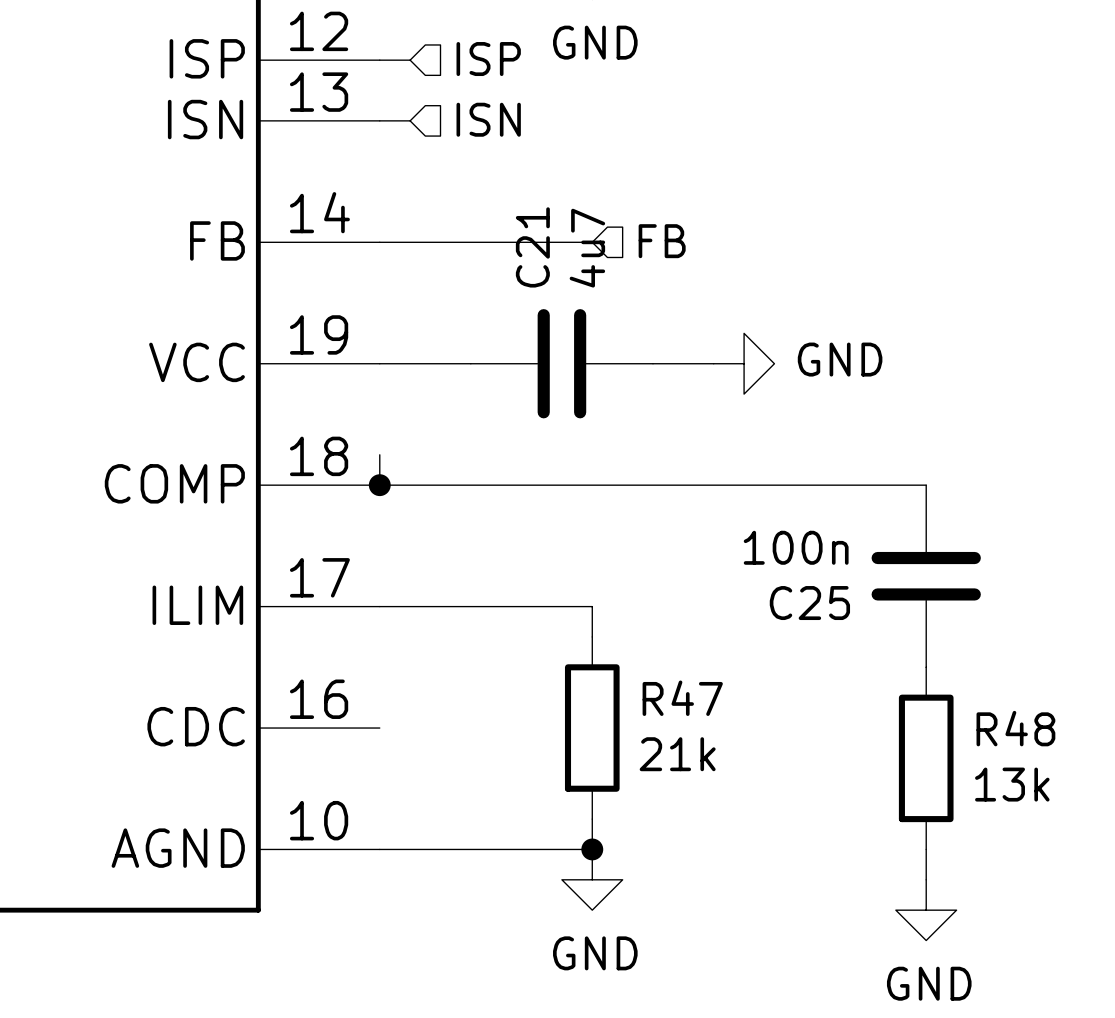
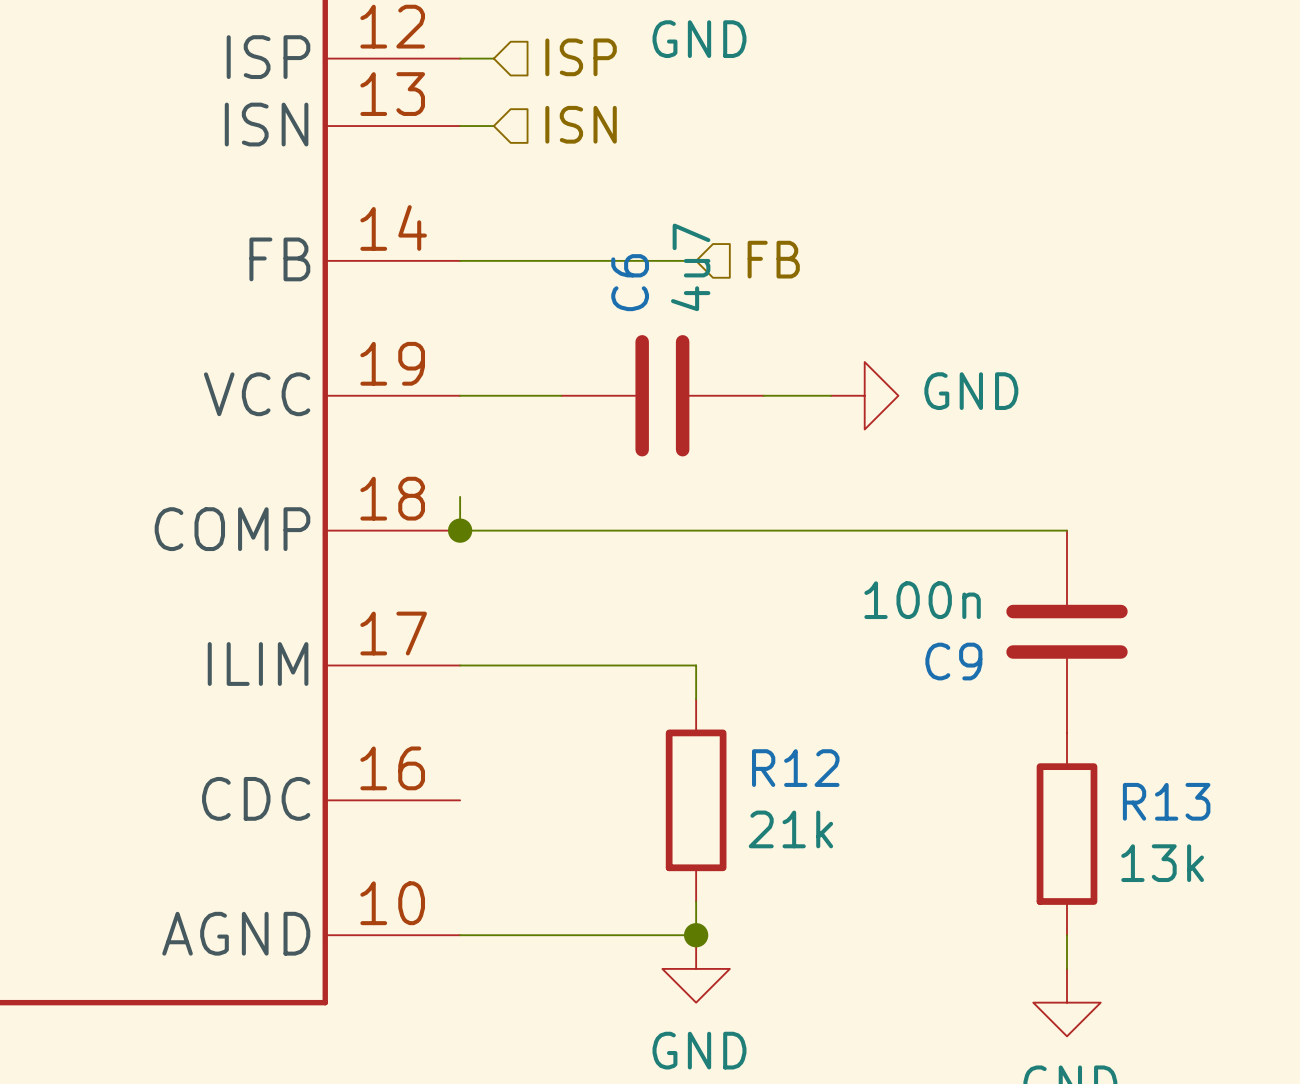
C21 name: C21 (532, 247) -> C6 (630, 282)
C25 name: C25 (809, 603) -> C9 (953, 661)
R47 name: R47 (682, 698) -> R12 (795, 768)
R48 name: R48 (1015, 728) -> R13 (1166, 801)

